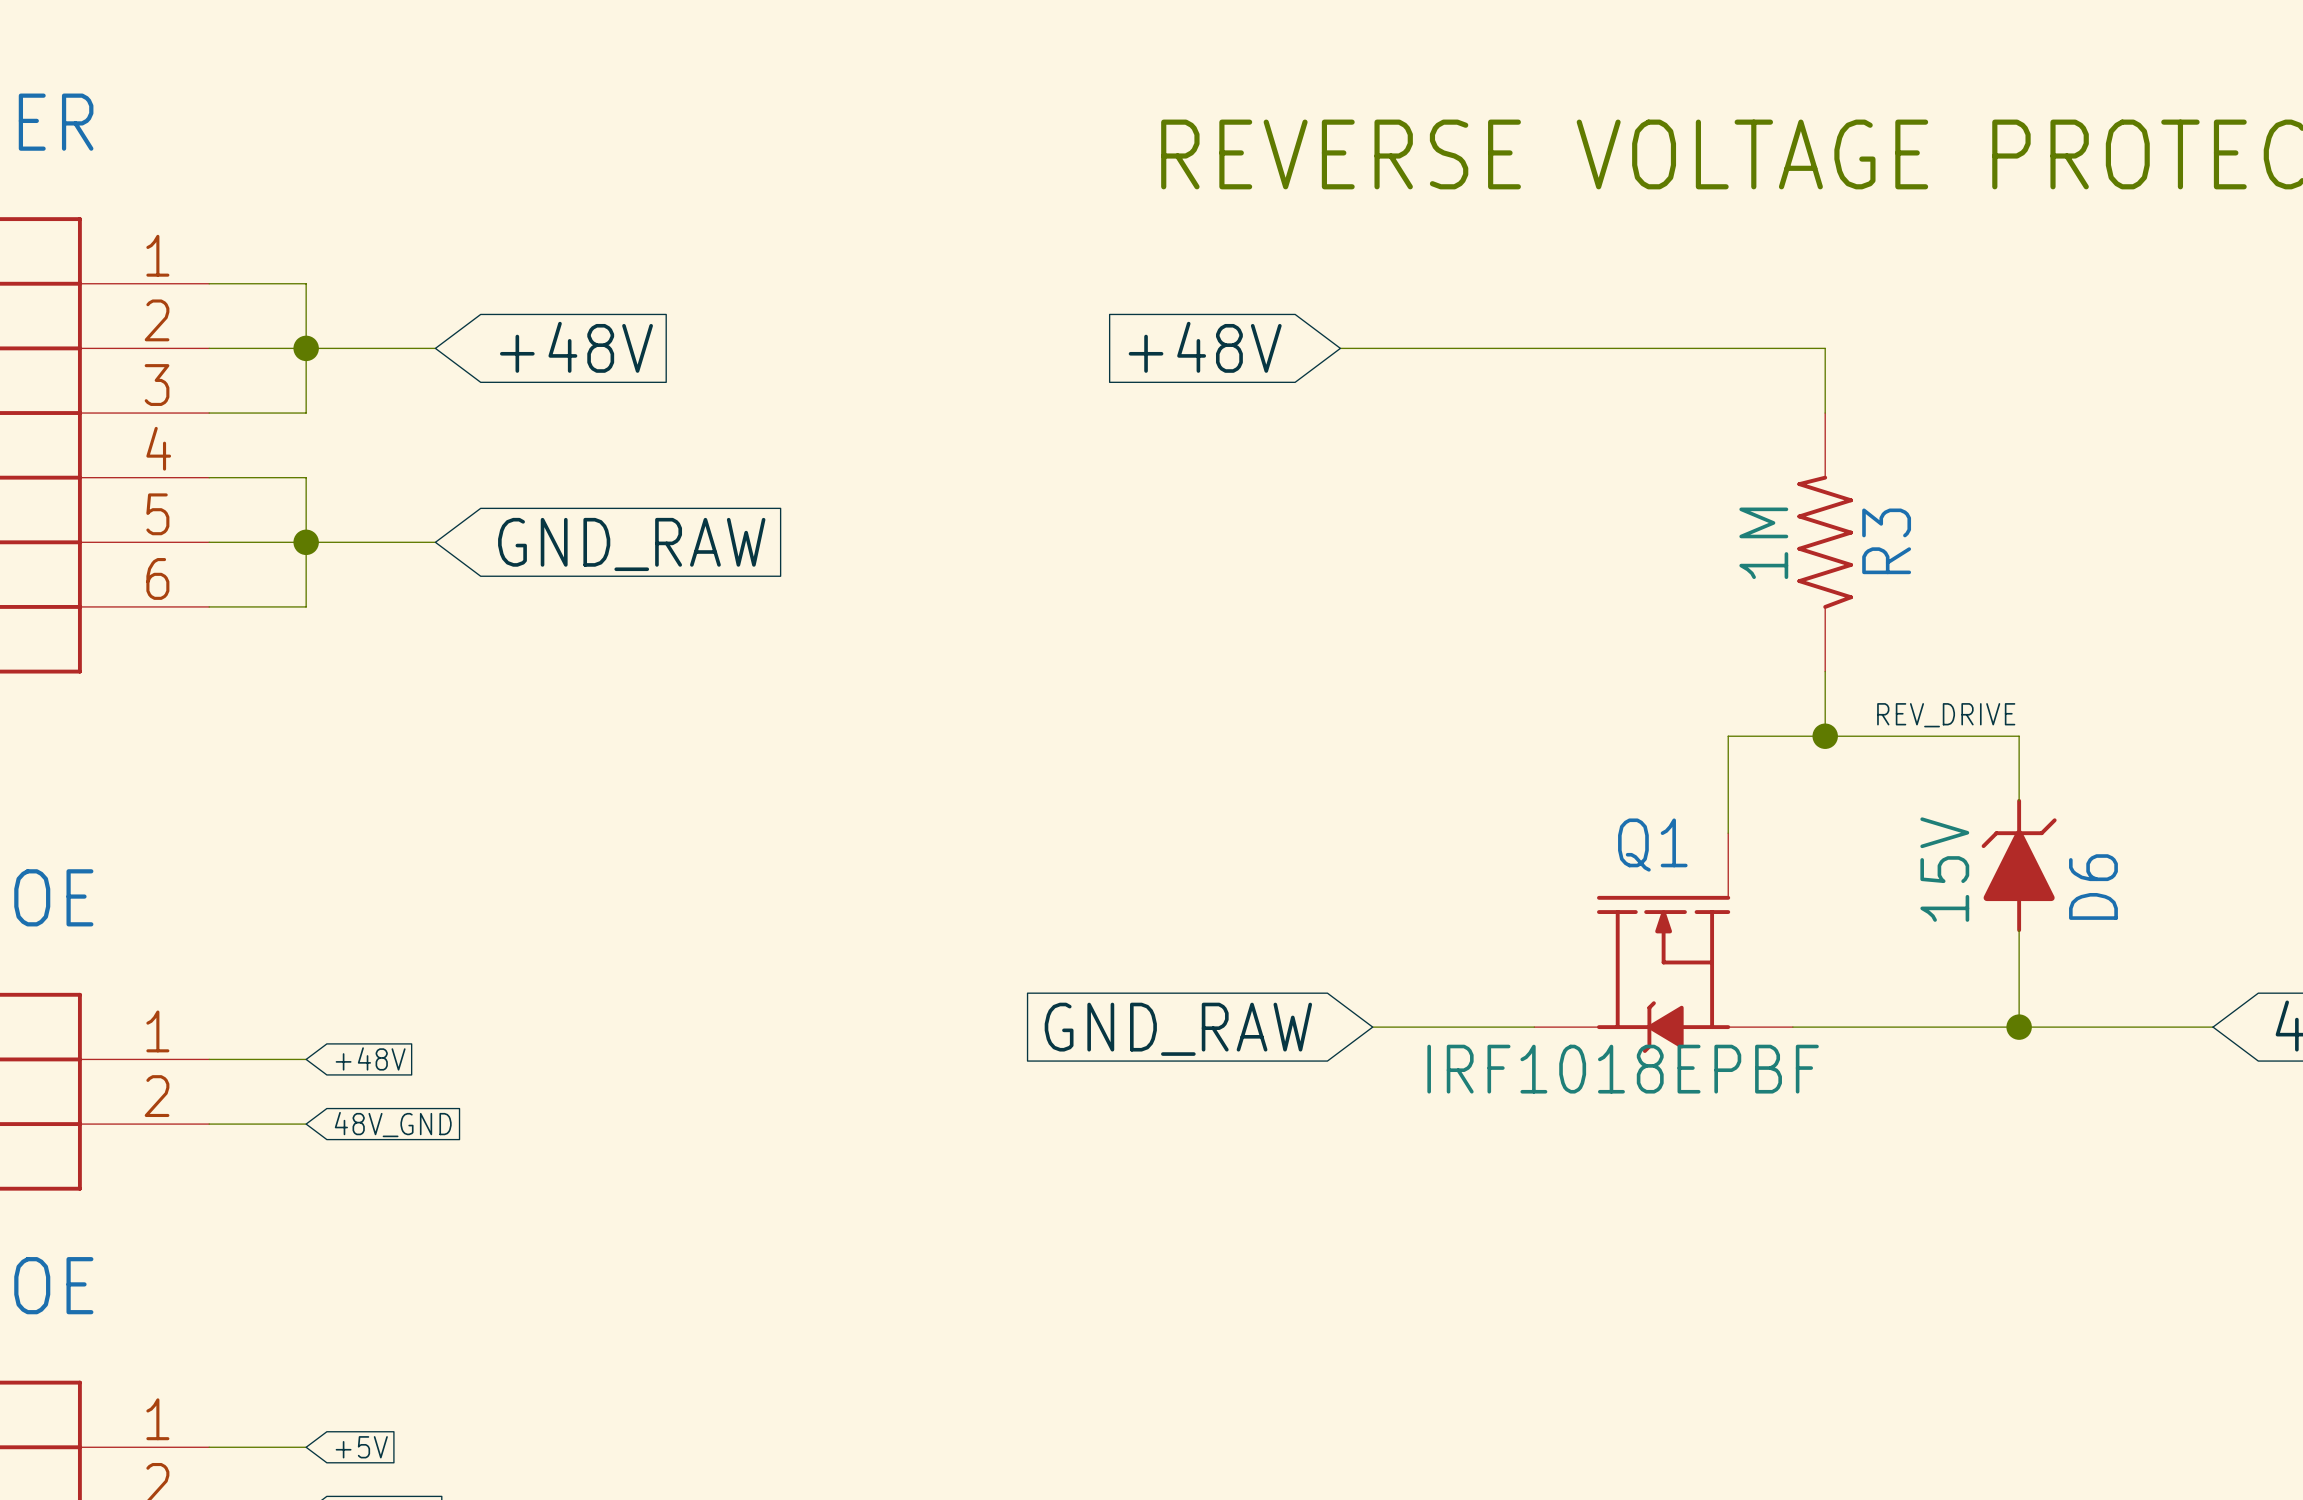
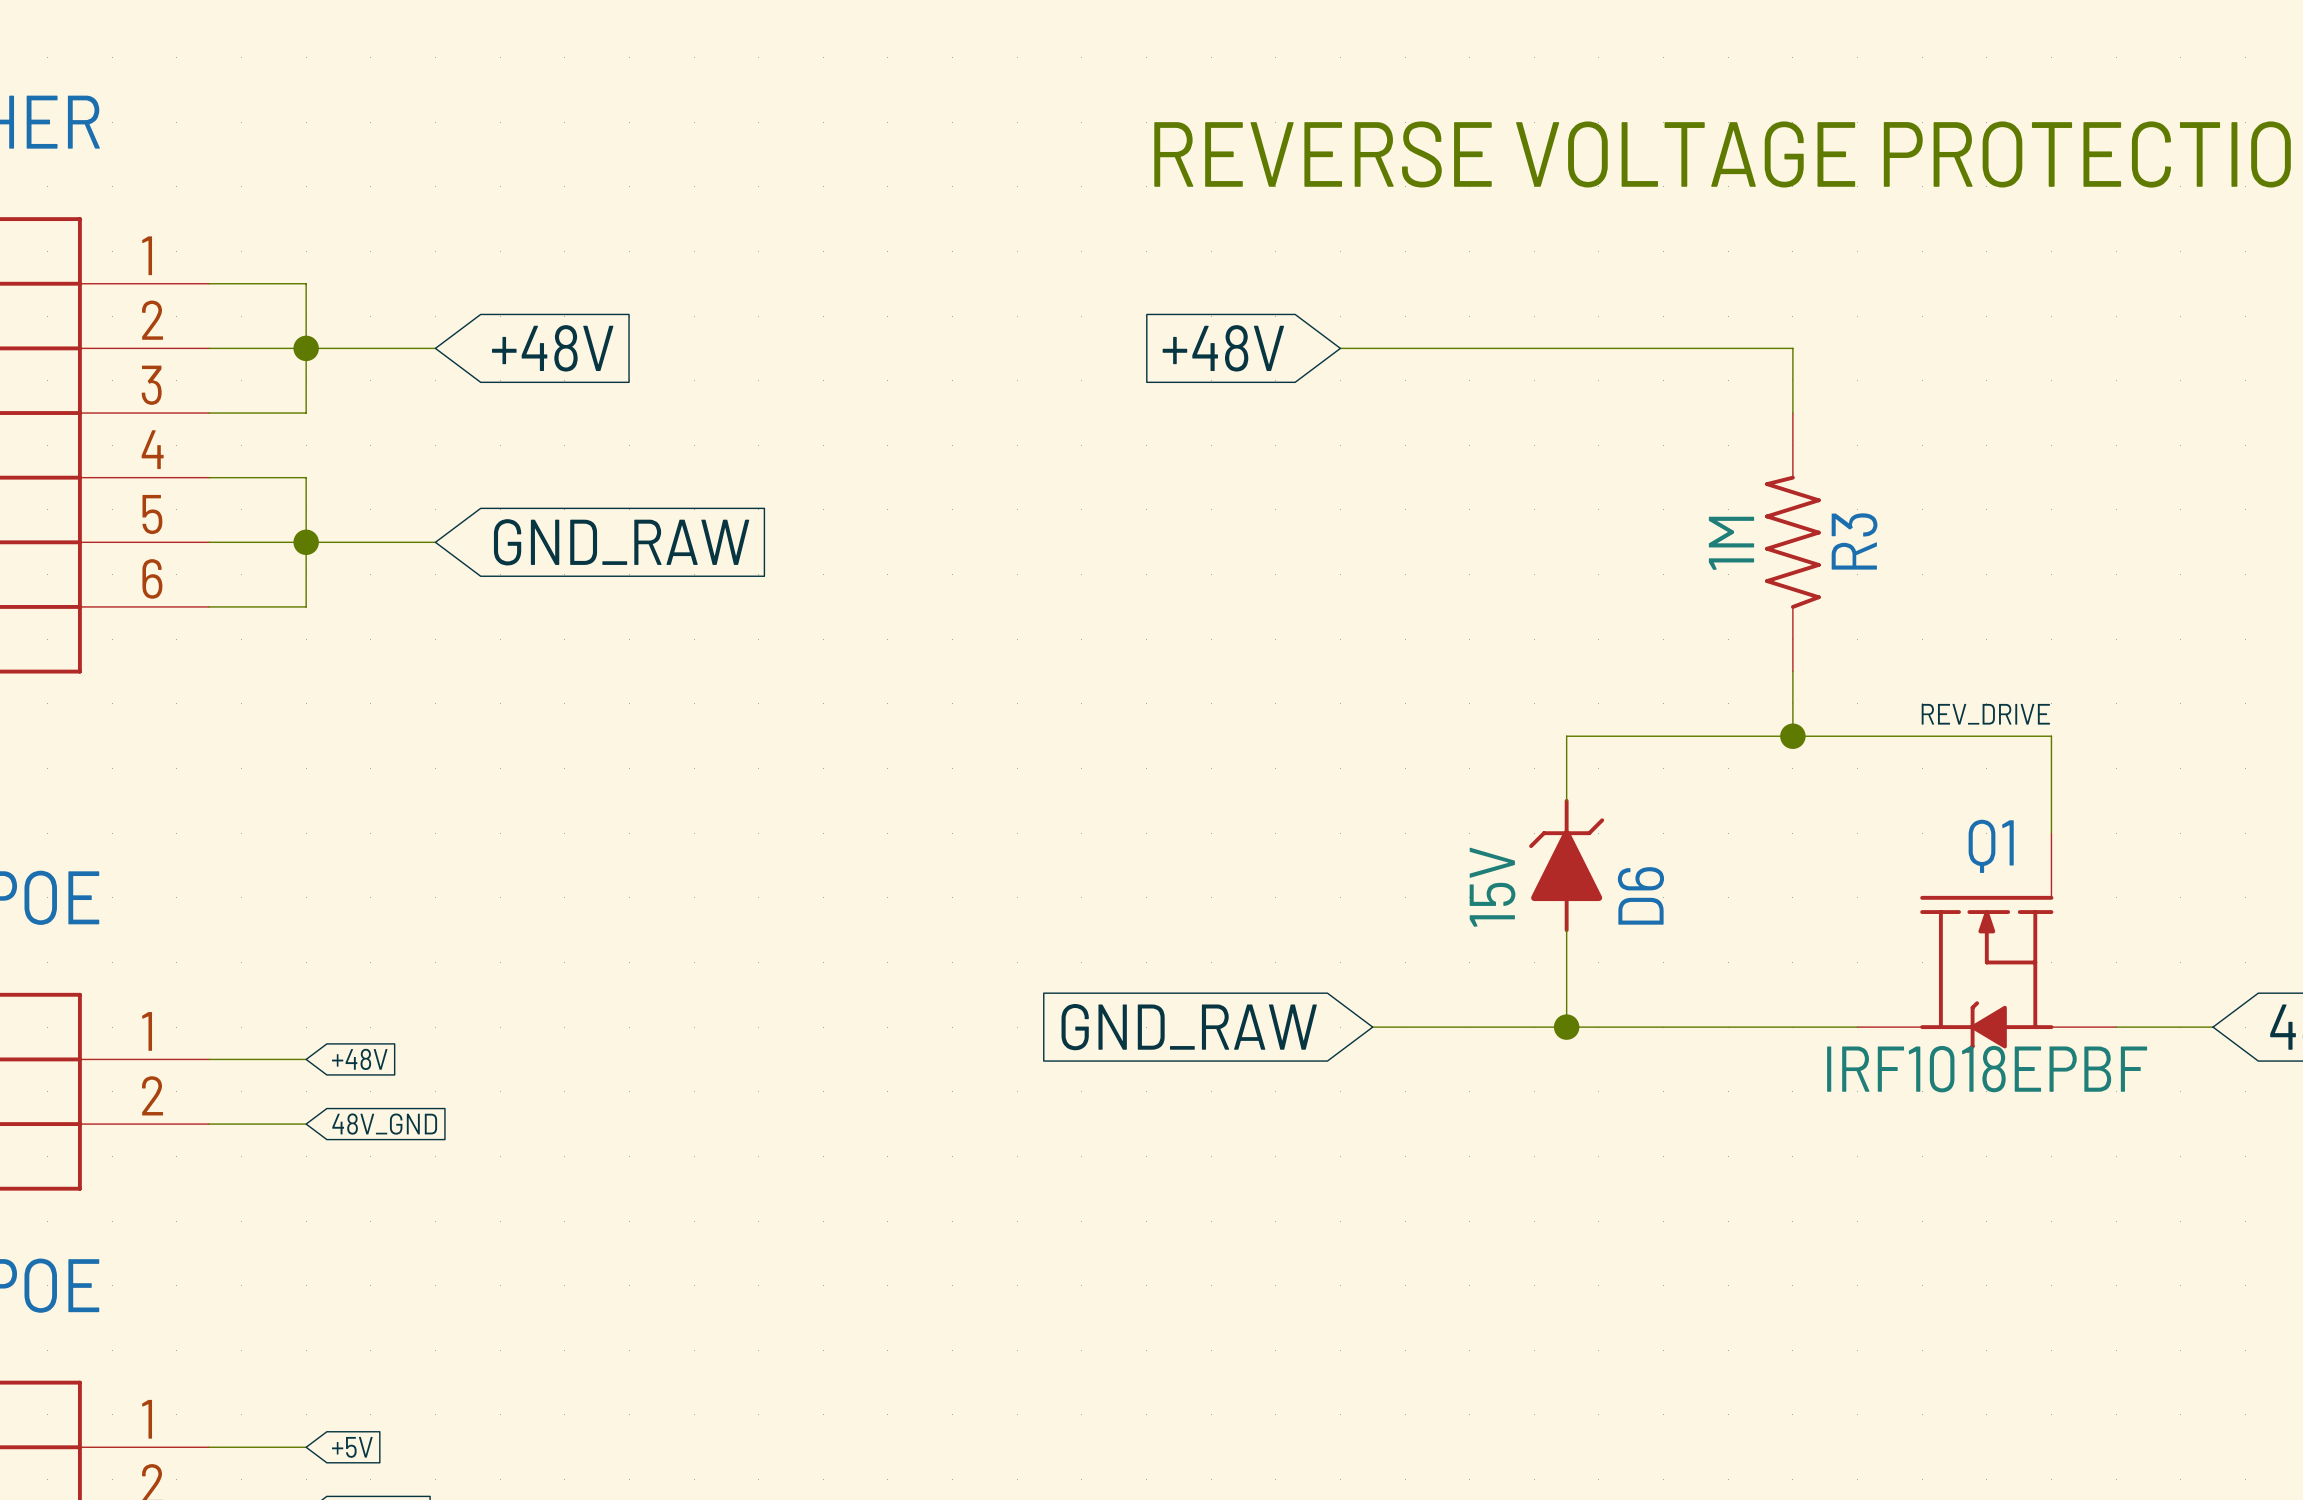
wire: (1792, 348) (1825, 348) (1825, 413) -> (1792, 348) (1792, 413)
R3 position: (1825, 542) -> (1792, 542)
wire: (1825, 671) (1825, 736) -> (1792, 671) (1792, 736)
label position: REV_DRIVE (1946, 715) -> REV_DRIVE (1985, 714)
wire: (1728, 736) (1728, 833) -> (1728, 736) (1566, 736) (1566, 800)
junction position: (1825, 736) -> (1792, 736)
wire: (2019, 736) (2019, 800) -> (2019, 736) (2051, 736) (2051, 833)
D6 position: (2019, 865) -> (1566, 865)
wire: (2019, 930) (2019, 1027) -> (1566, 930) (1566, 1027)
Q1 position: (1663, 943) -> (1986, 943)
junction: none -> (1566, 1027)
junction: (2019, 1027) -> none

